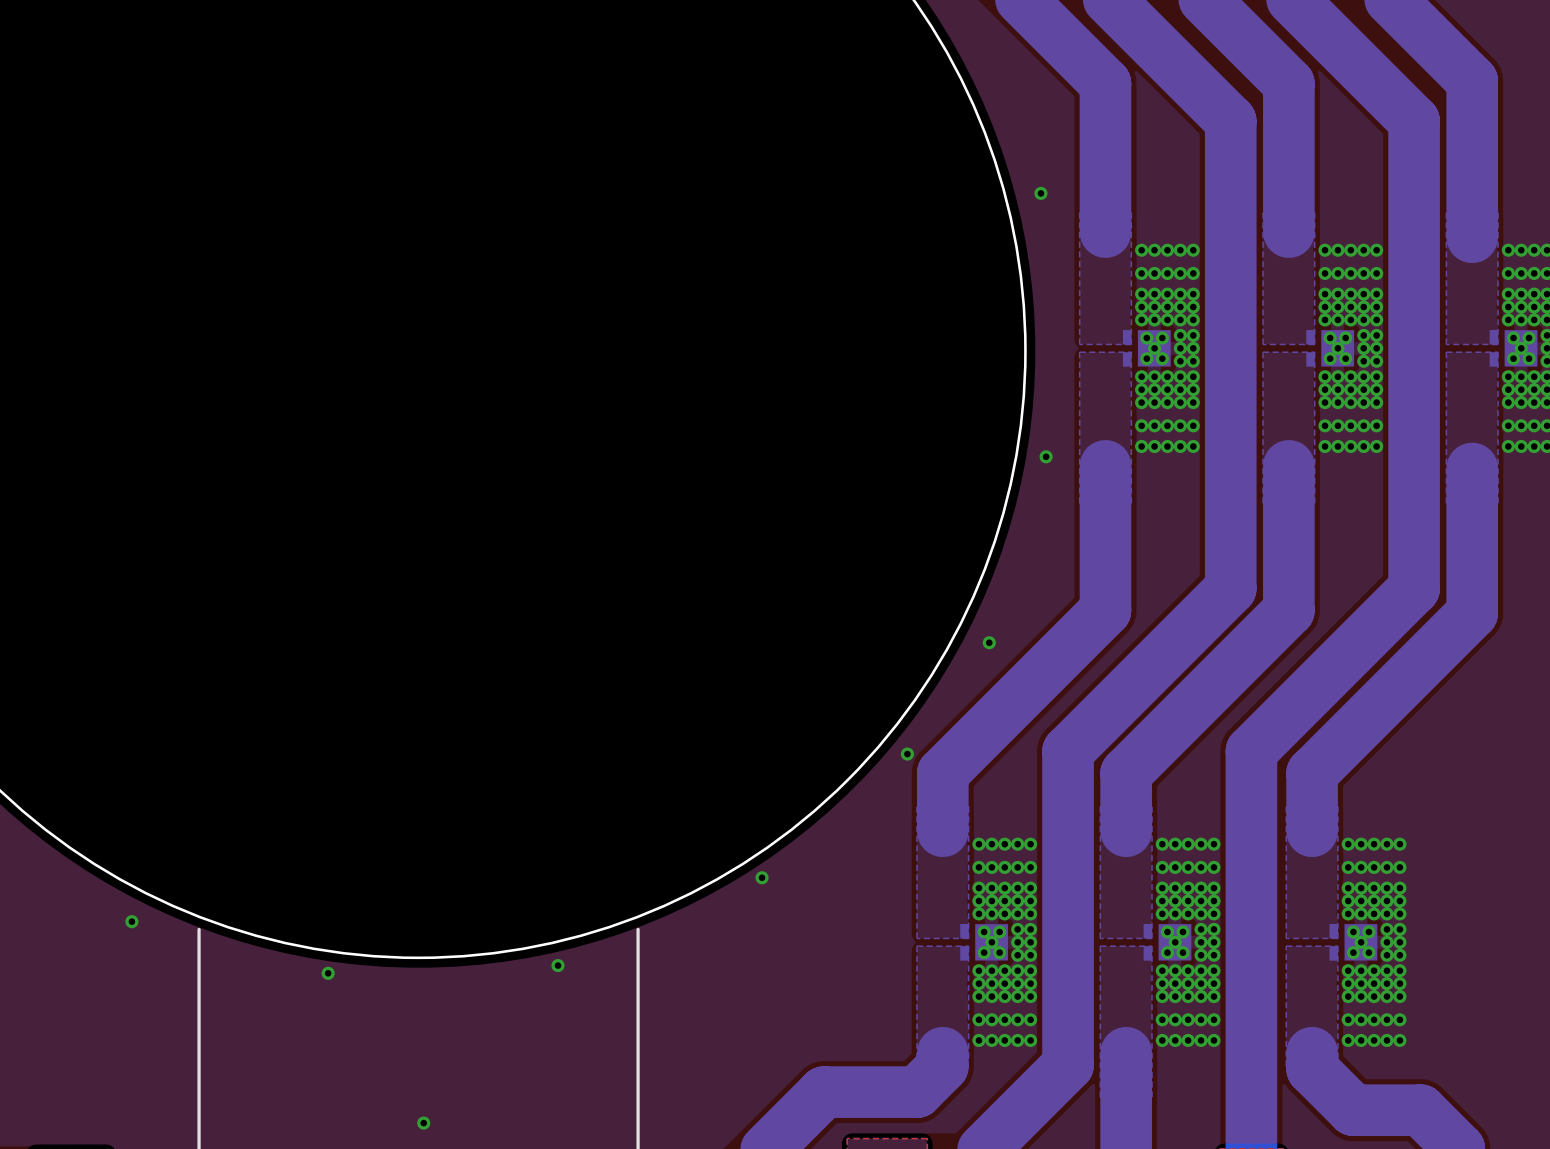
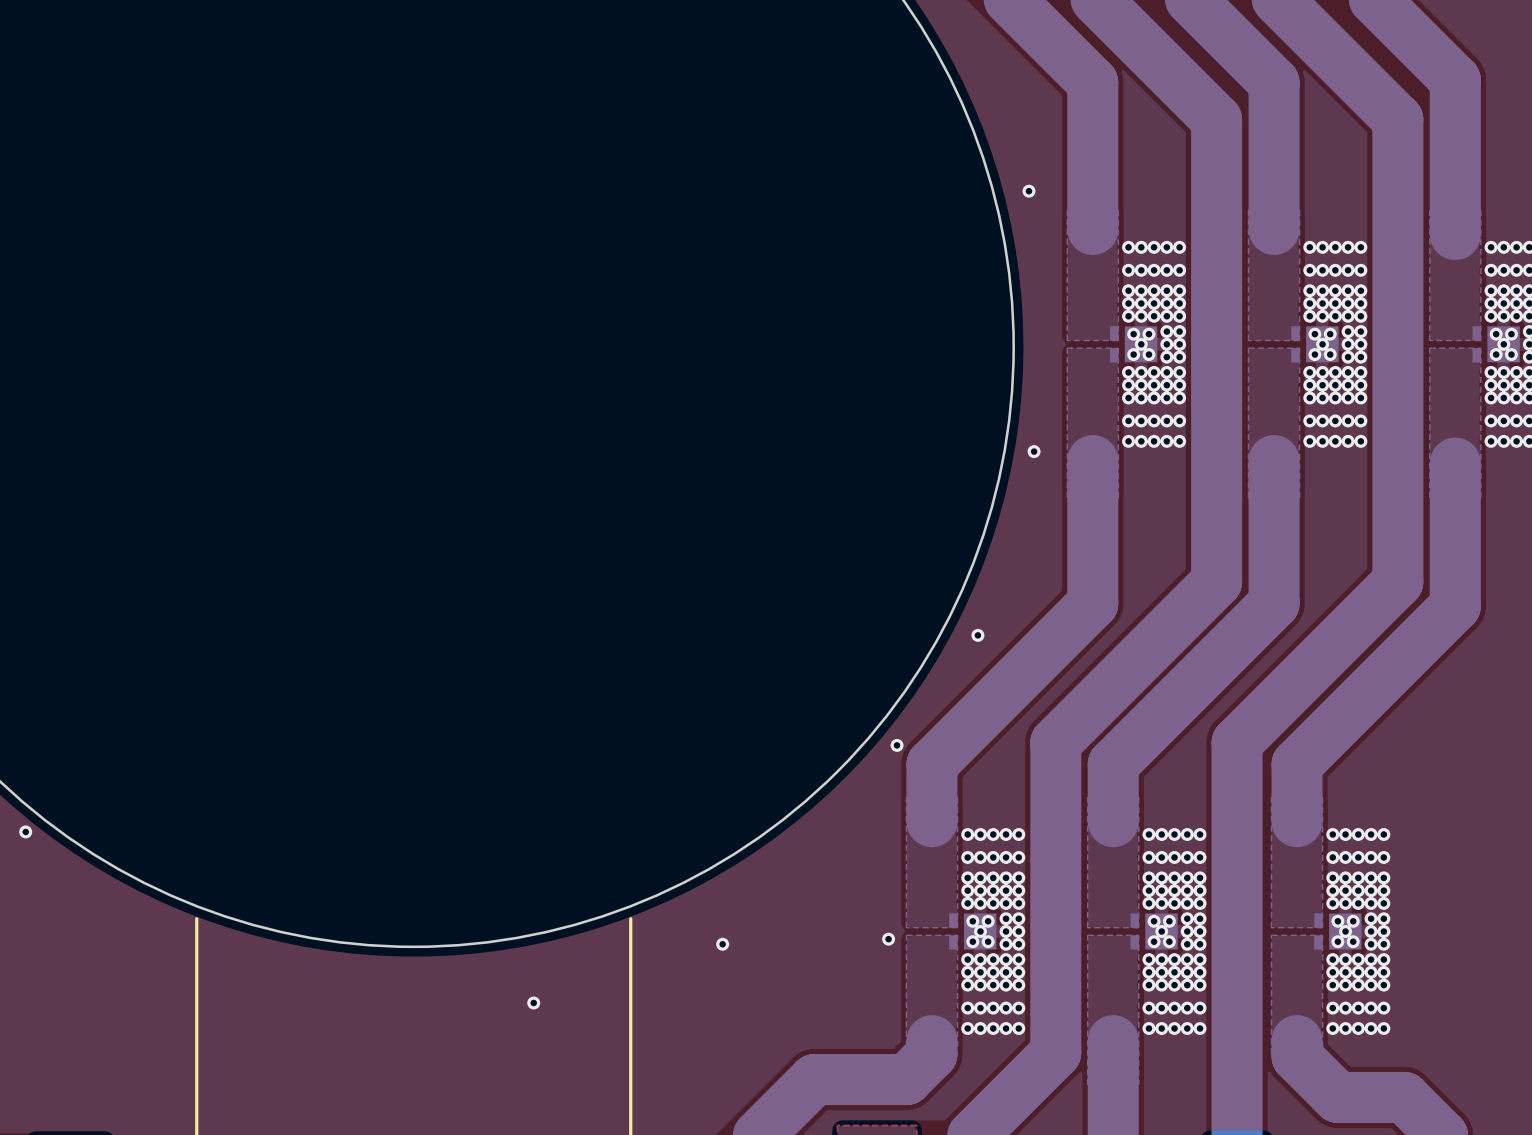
via: (762, 877) -> none
via position: (131, 921) -> (25, 831)
via: none -> (888, 939)
via: none -> (722, 944)
via position: (558, 965) -> (533, 1002)
via: (328, 973) -> none
via: (423, 1123) -> none

